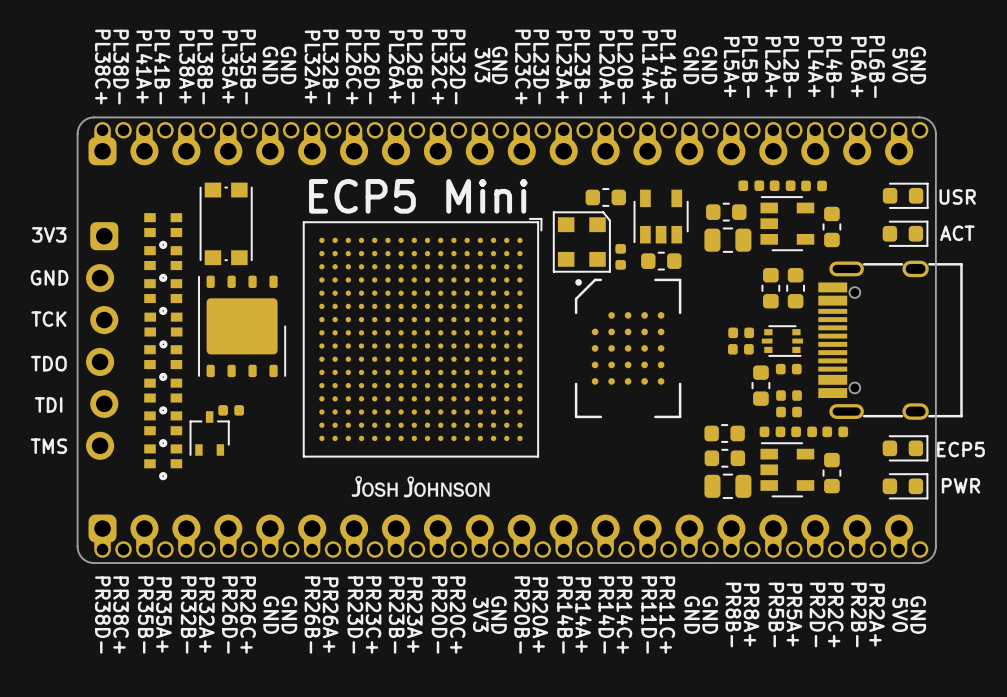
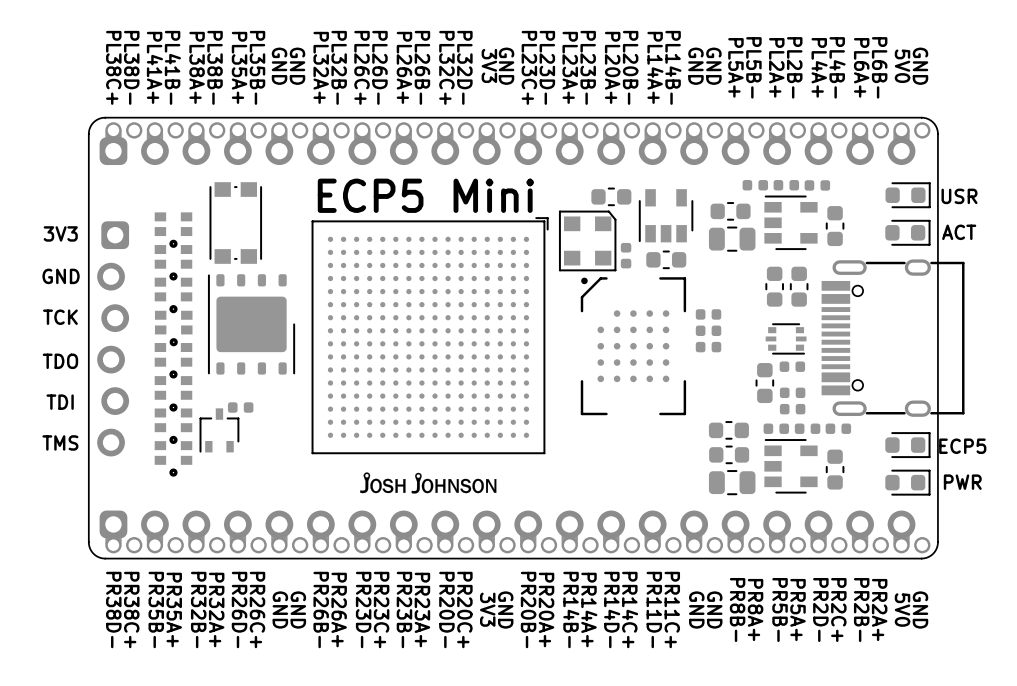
part: none -> (708, 314)
part: none -> (708, 330)
part: (741, 332) -> none
part: none -> (708, 347)
part: (740, 349) -> none

